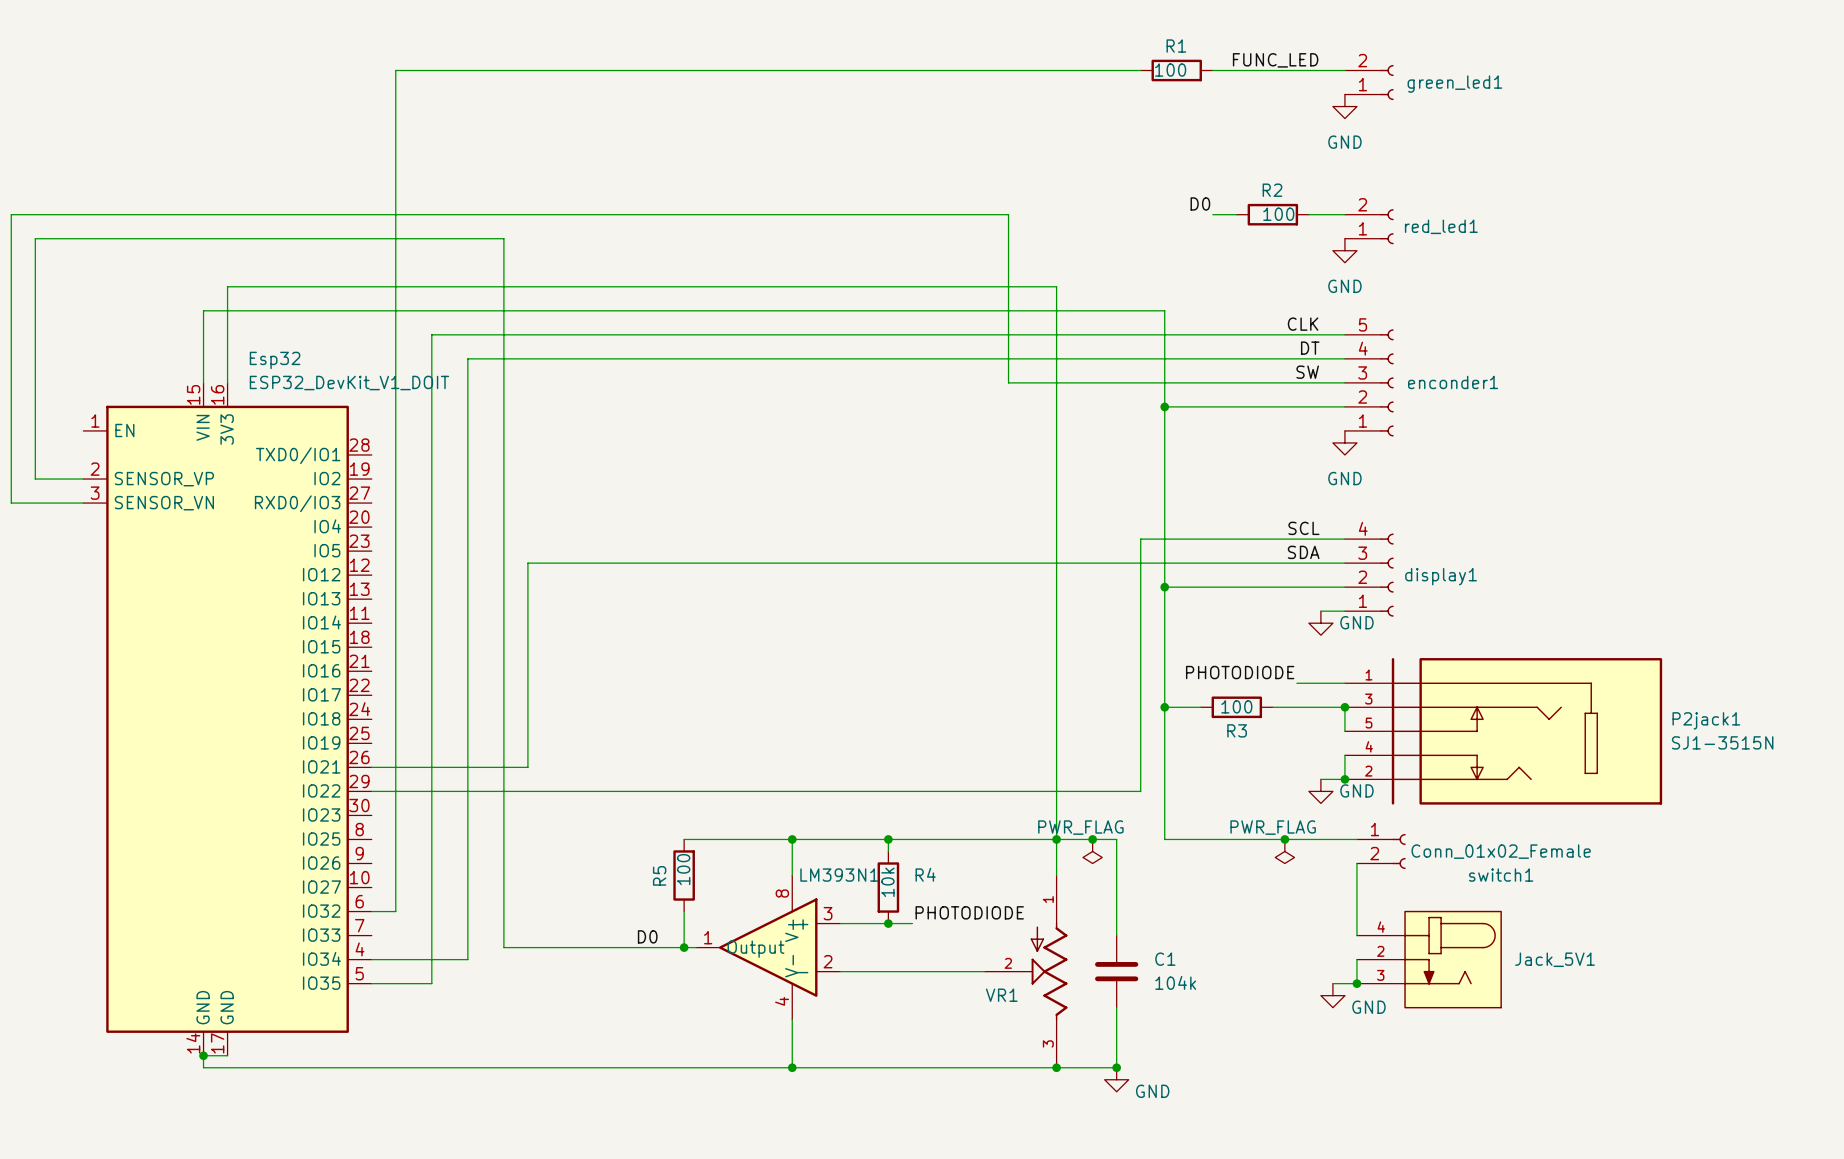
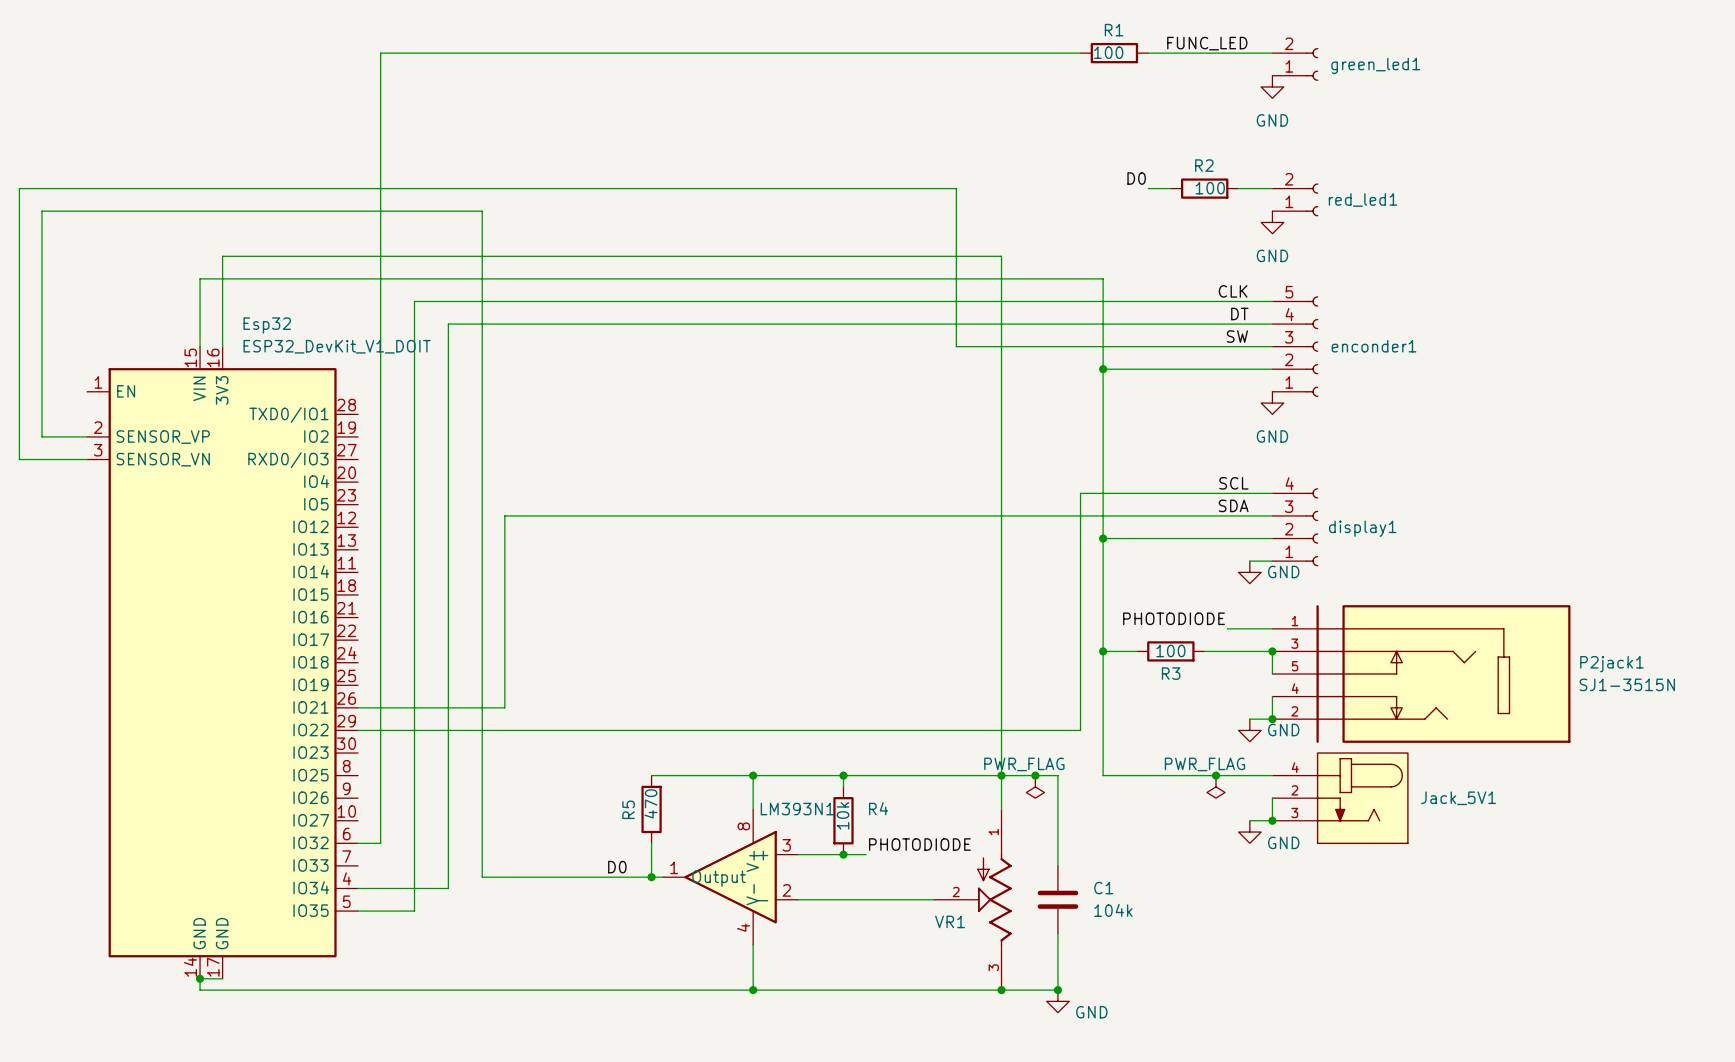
switch1: Conn_01x02_Female (1381, 851) -> none
wire: (1356, 863) (1356, 935) -> none
R5 value: 100 (683, 869) -> 470 (650, 803)
junction: none -> (1272, 820)
wire: (1356, 959) (1356, 983) (1332, 983) -> (1272, 798) (1272, 820) (1249, 820)
Jack_5V1 position: (1429, 959) -> (1340, 798)
junction: (1356, 983) -> none
power symbol position: GND (1332, 995) -> GND (1249, 832)

